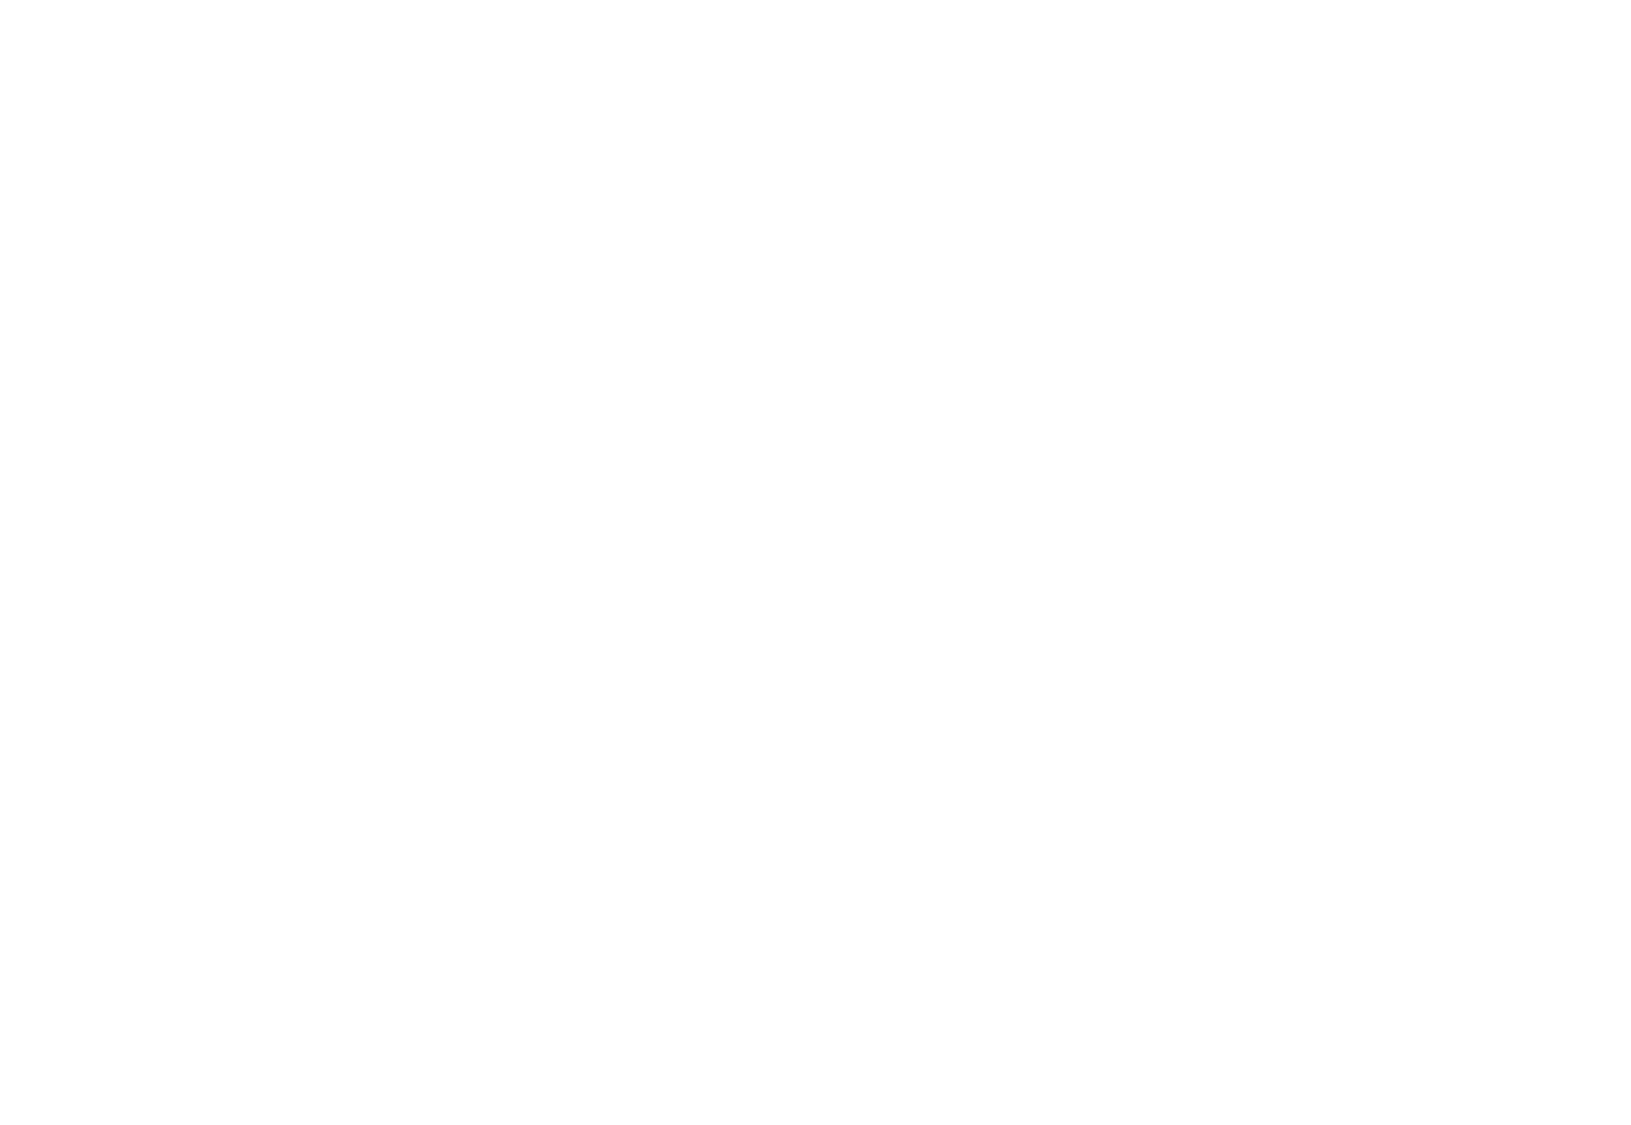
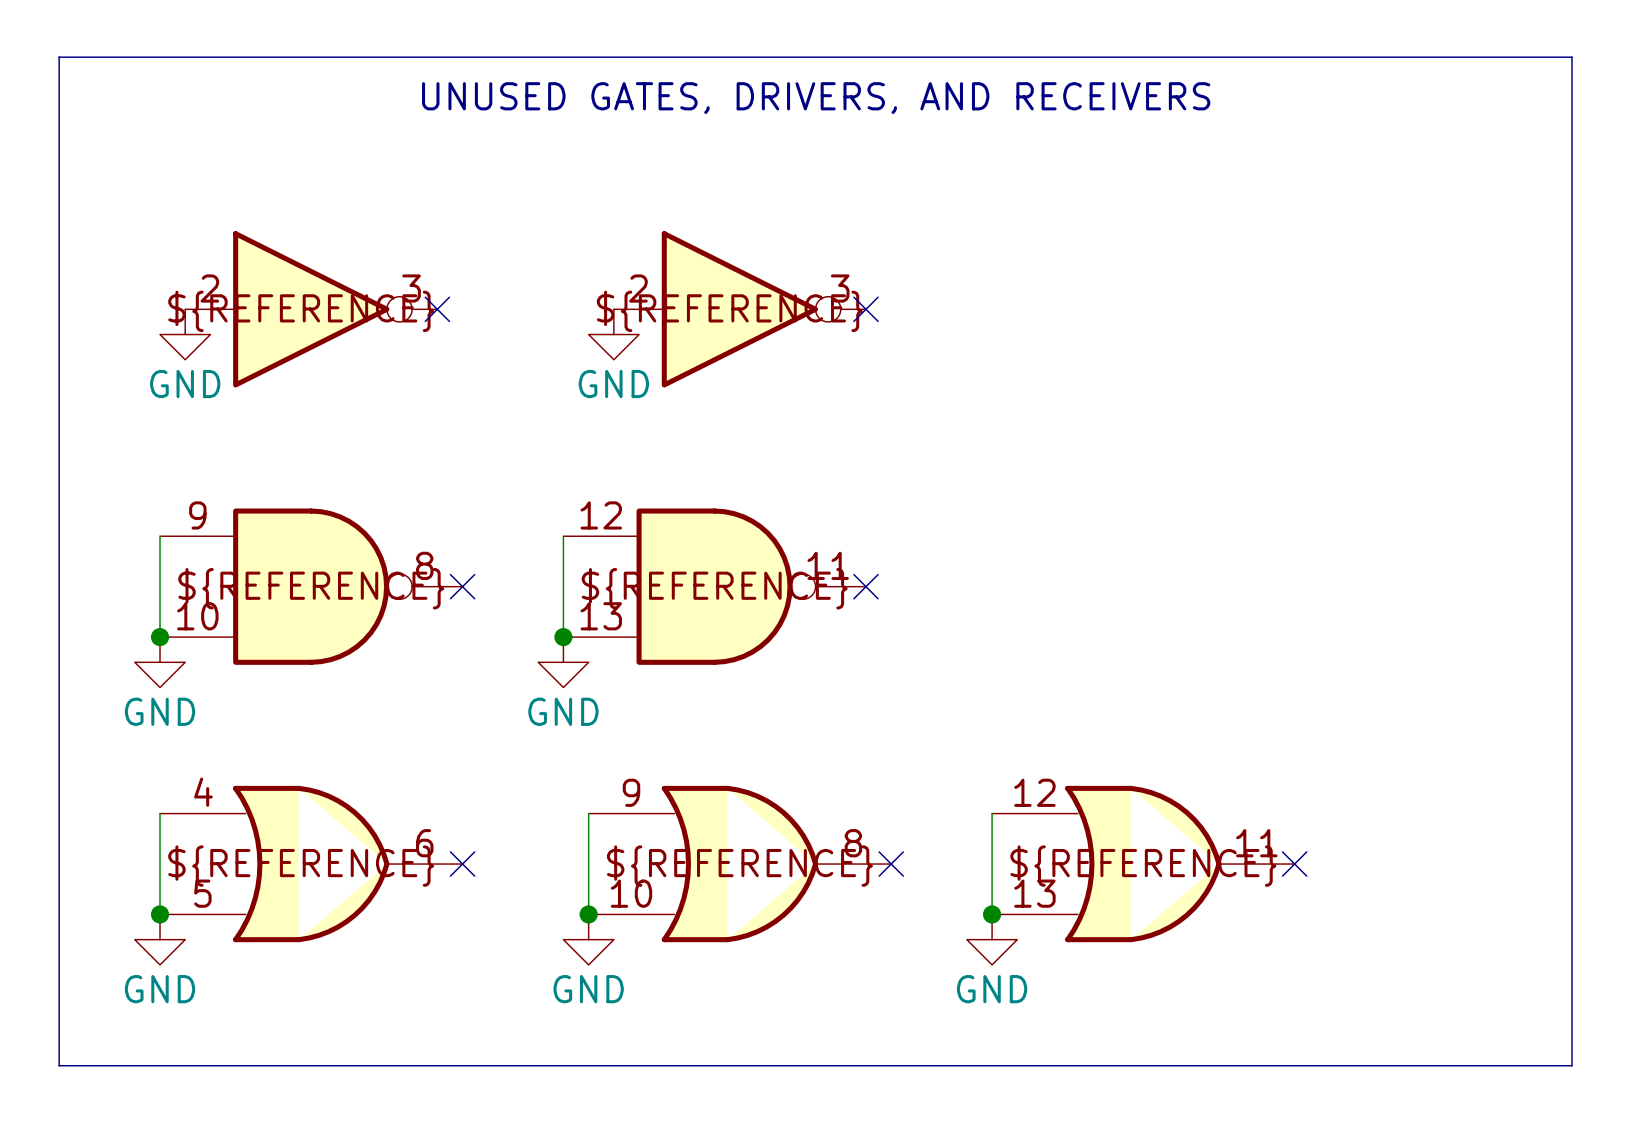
line: none -> (59, 57) (1571, 57) (1571, 1065) (59, 1065) (59, 57)
text: none -> UNUSED GATES, DRIVERS, AND RECEIVERS (816, 98)
part: none -> (311, 309)
no-connect mark: none -> (437, 309)
part: none -> (739, 309)
no-connect mark: none -> (865, 309)
power symbol: none -> GND (185, 334)
power symbol: none -> GND (613, 334)
wire: none -> (160, 536) (160, 637)
wire: none -> (563, 536) (563, 637)
part: none -> (311, 586)
no-connect mark: none -> (462, 586)
part: none -> (714, 586)
no-connect mark: none -> (865, 586)
junction: none -> (160, 637)
junction: none -> (563, 637)
power symbol: none -> GND (160, 662)
power symbol: none -> GND (563, 662)
wire: none -> (160, 813) (160, 914)
wire: none -> (588, 813) (588, 914)
wire: none -> (992, 813) (992, 914)
part: none -> (311, 864)
no-connect mark: none -> (462, 864)
part: none -> (739, 864)
no-connect mark: none -> (891, 864)
part: none -> (1143, 864)
no-connect mark: none -> (1294, 864)
junction: none -> (160, 914)
junction: none -> (588, 914)
junction: none -> (992, 914)
power symbol: none -> GND (160, 939)
power symbol: none -> GND (588, 939)
power symbol: none -> GND (992, 939)

